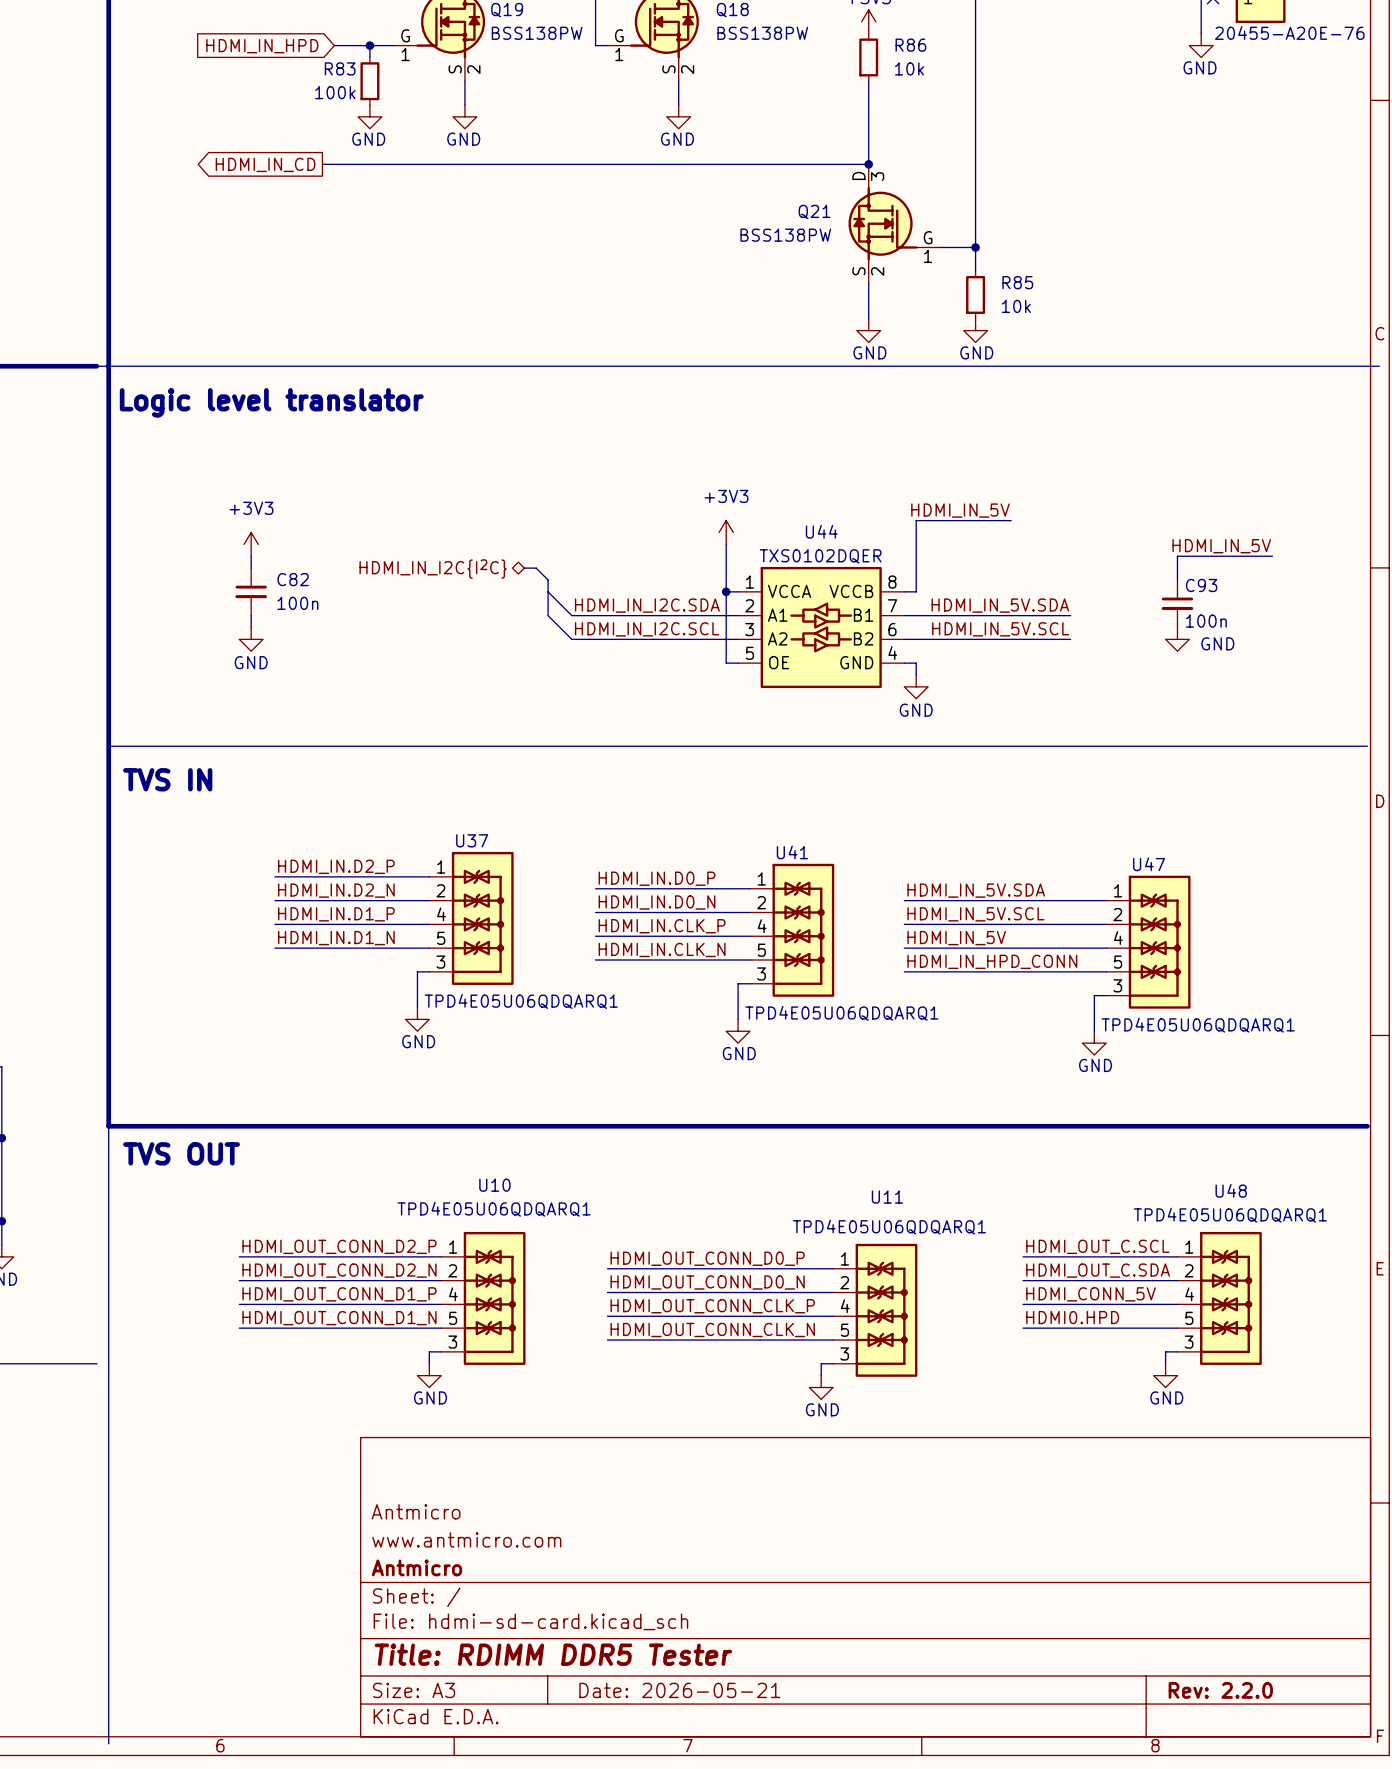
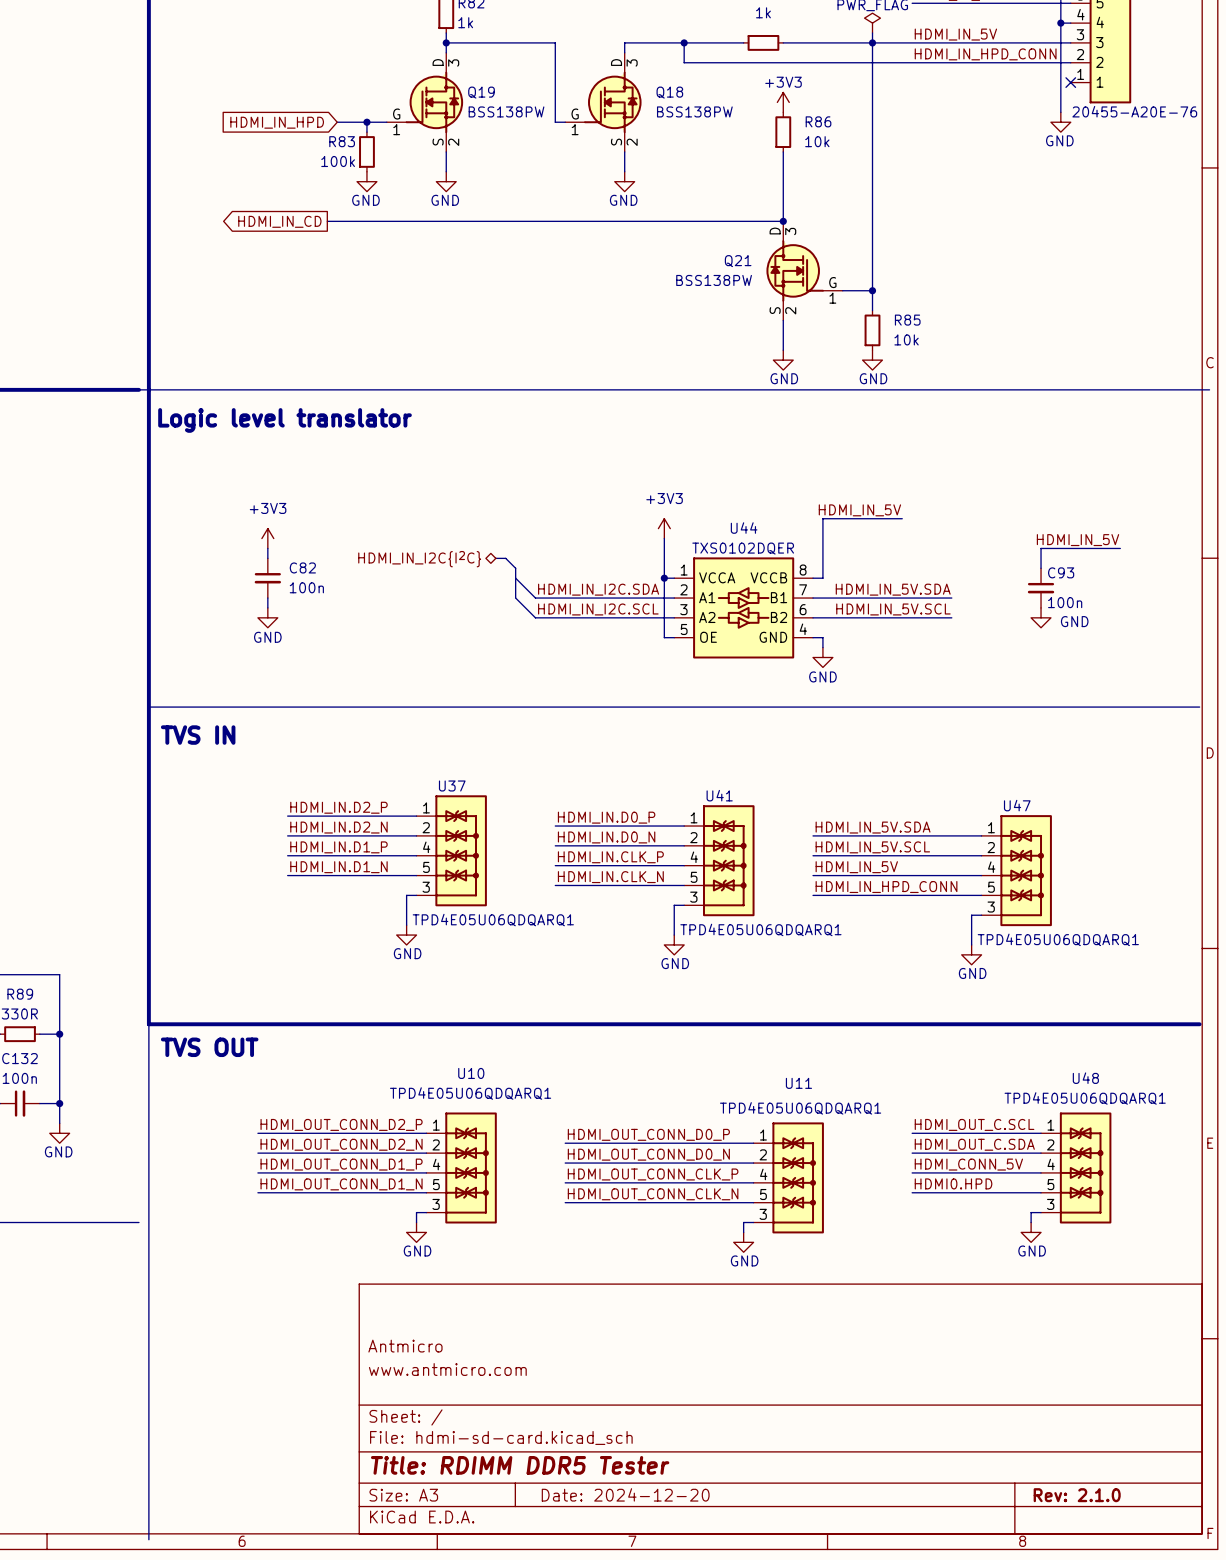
title block: Antmicro (416, 1567) -> none
title block: Date: 2026-05-21 (679, 1690) -> Date: 2024-12-20 (625, 1494)
title block: Rev: 2.2.0 (1220, 1690) -> Rev: 2.1.0 (1077, 1495)

